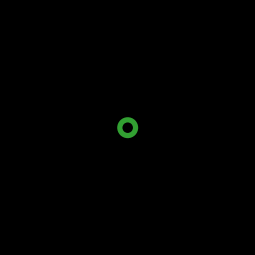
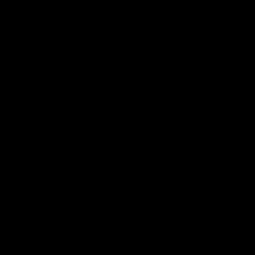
via: (127, 127) -> none

